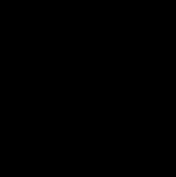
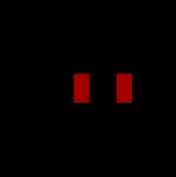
part: none -> (102, 88)

